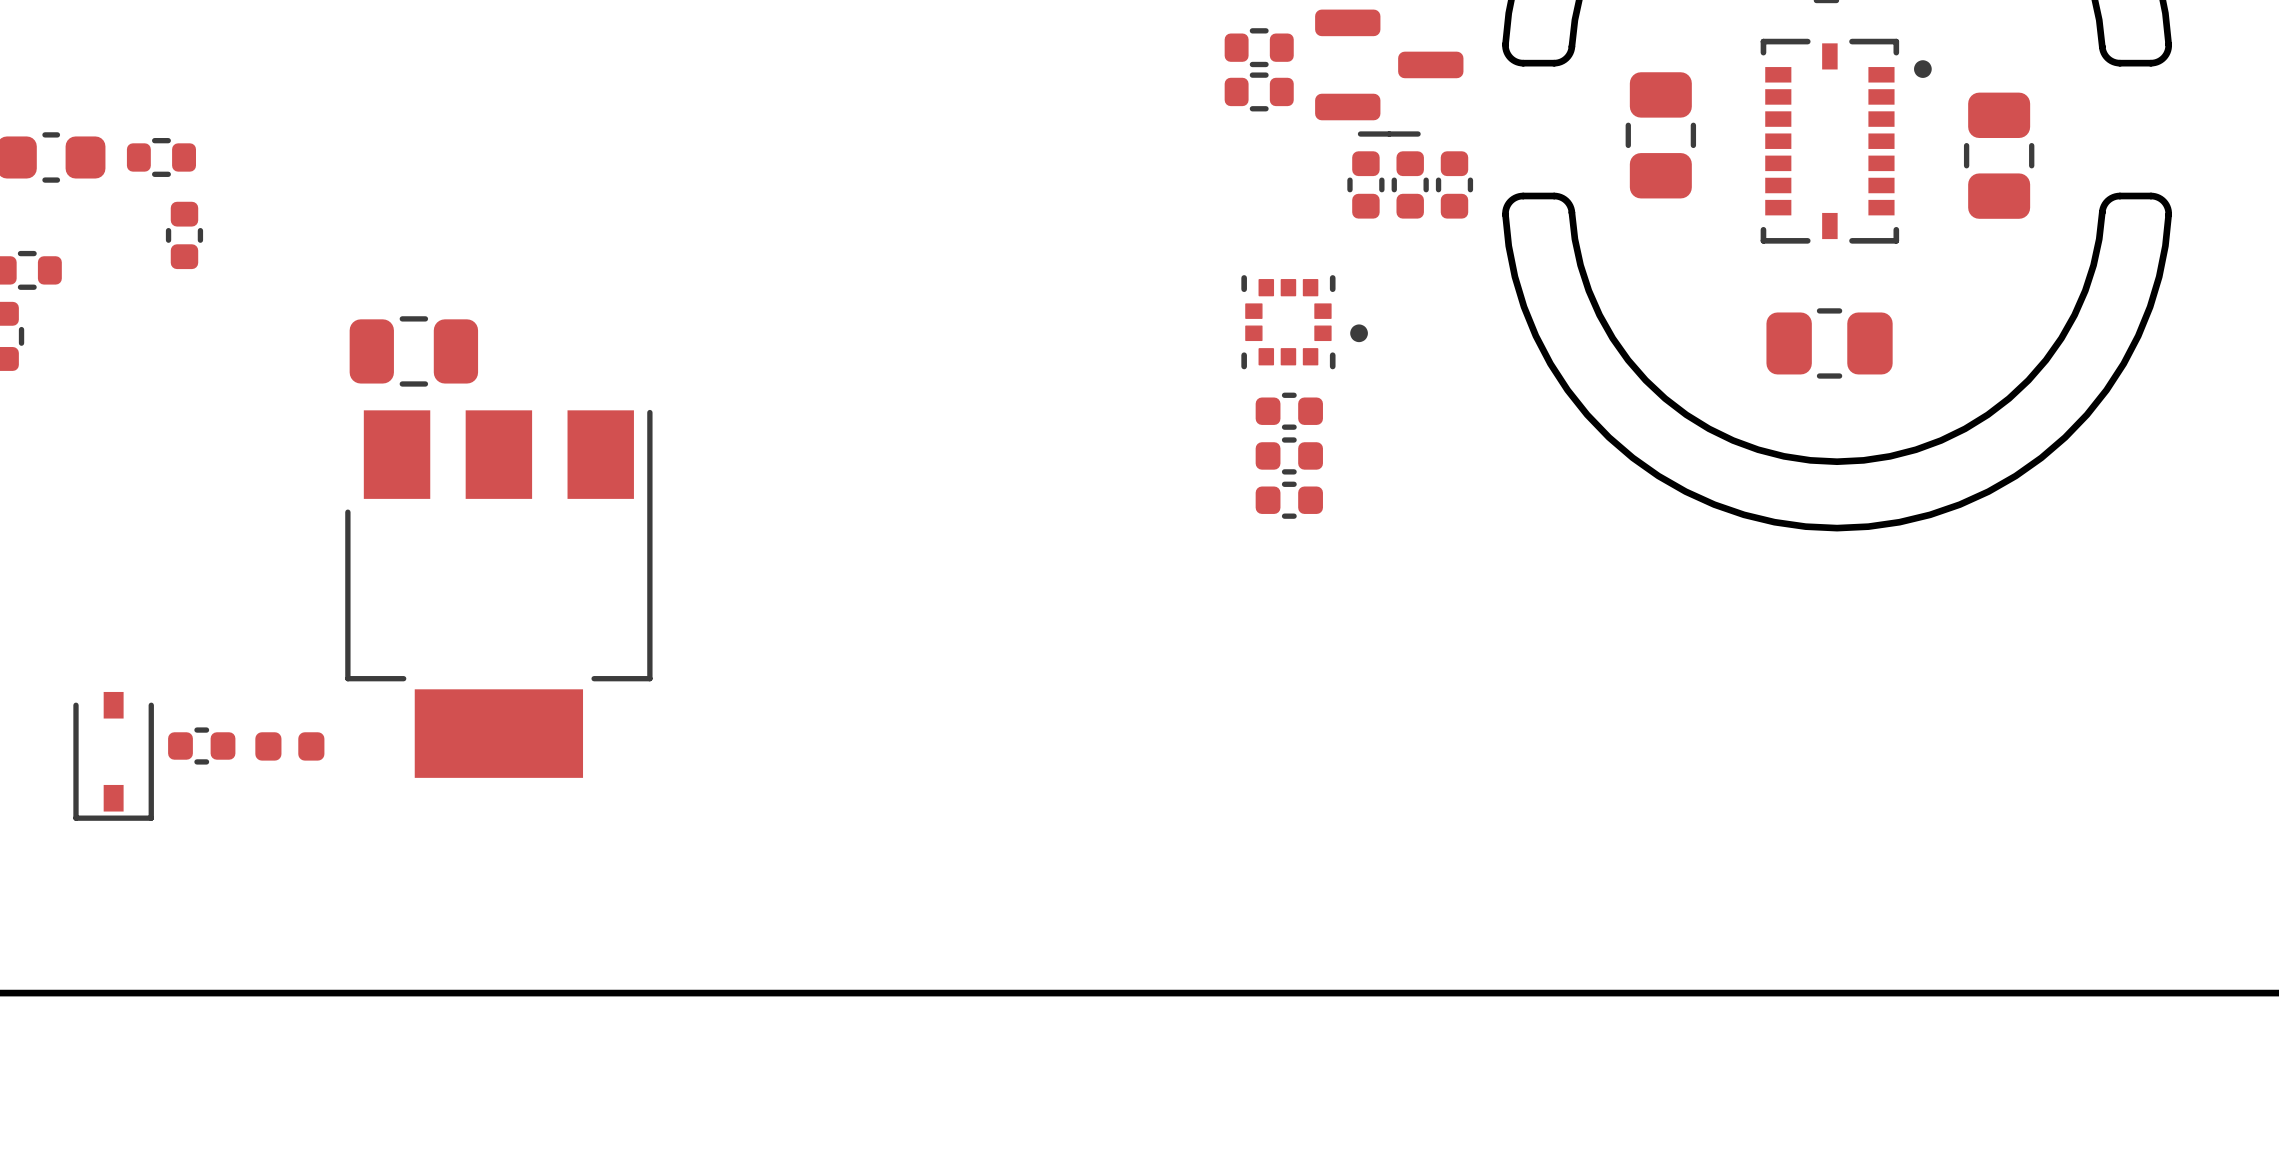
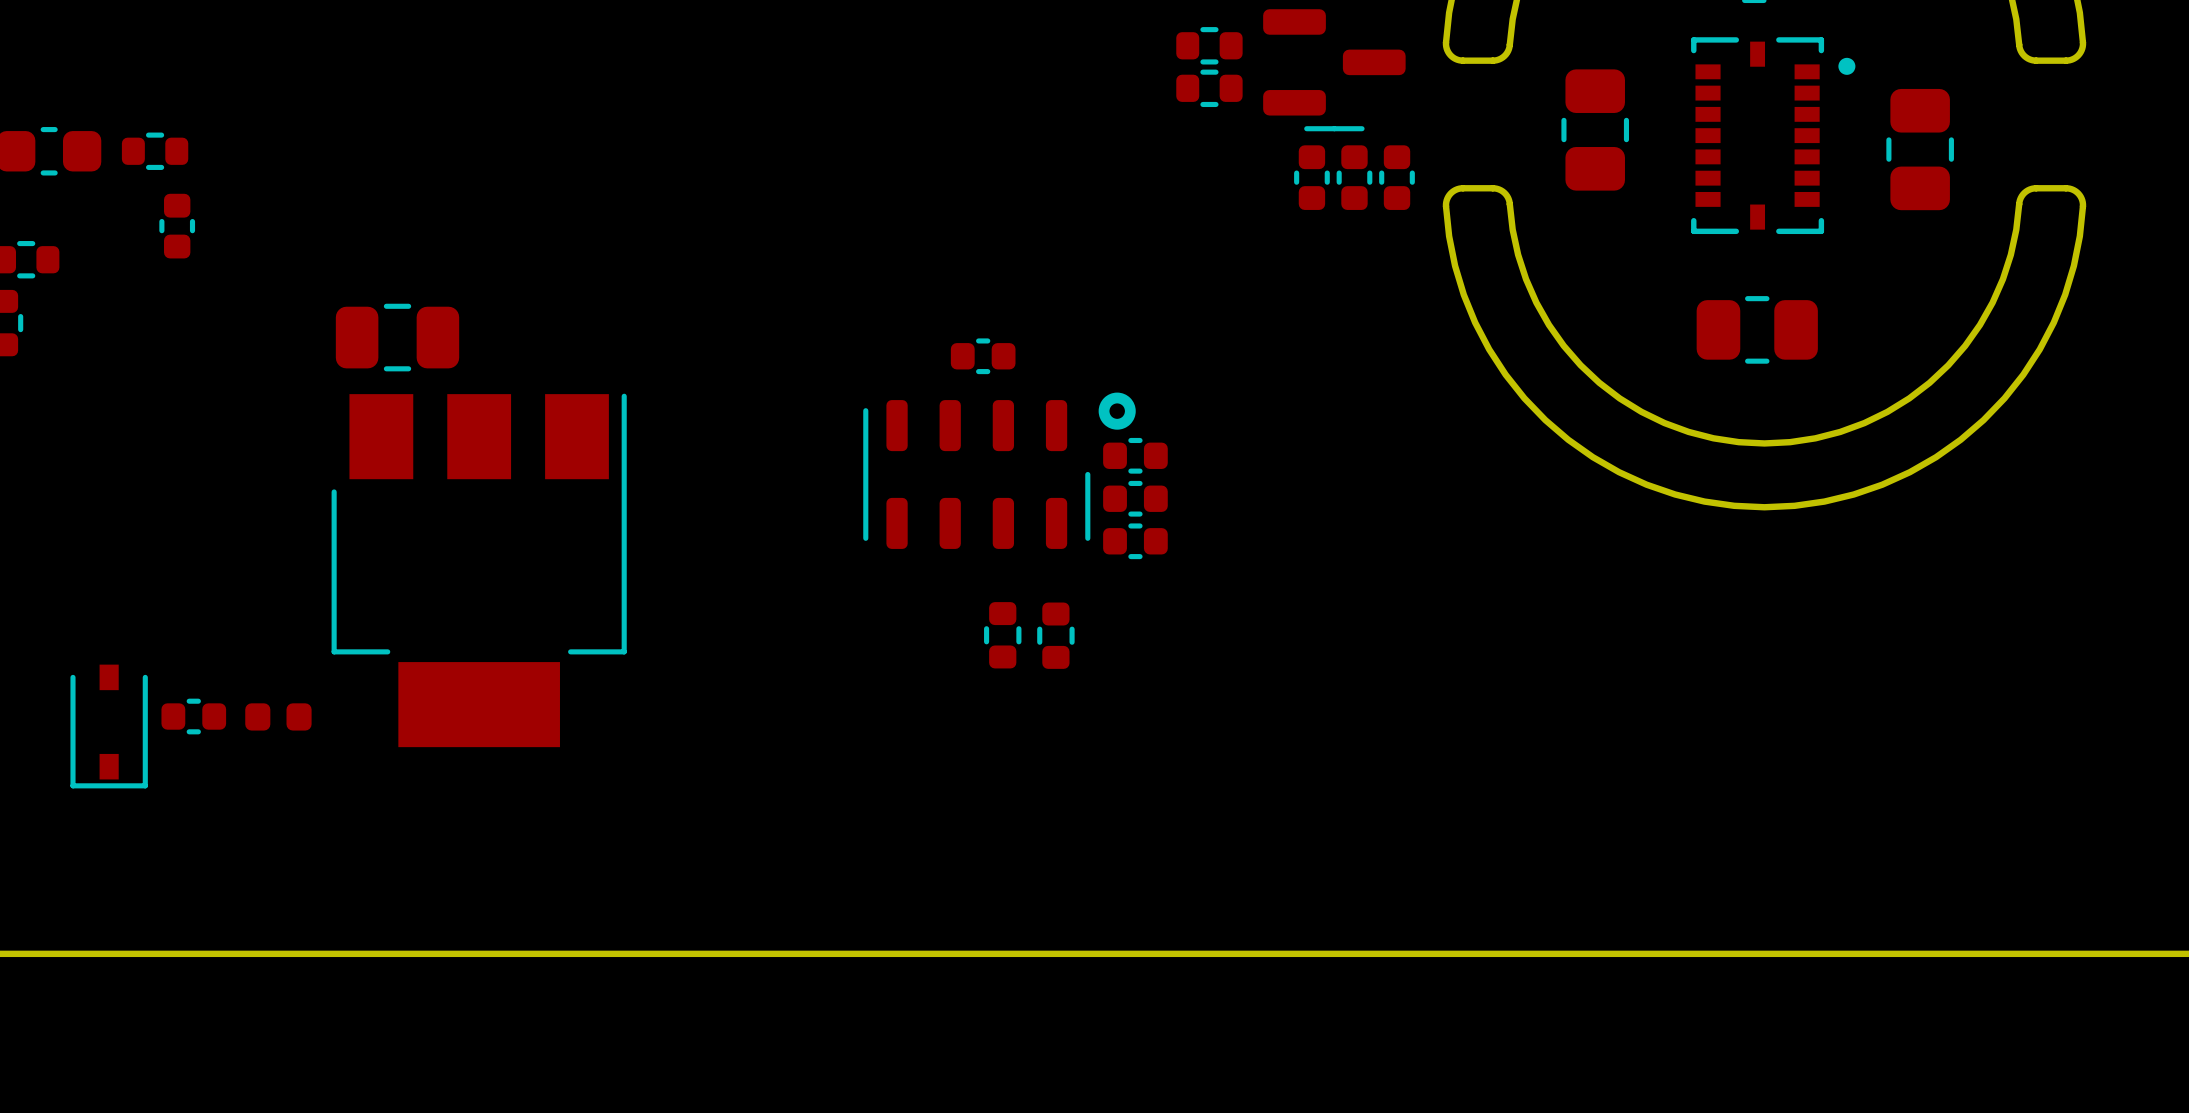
part: (1304, 322) -> none
part: none -> (983, 356)
drawing: none -> [1098, 392, 1136, 430]
part: (1289, 411) -> none
part: (1289, 455) -> none
part: none -> (1135, 455)
part: none -> (976, 474)
part: (1289, 500) -> none
part: none -> (1135, 498)
part: none -> (1135, 541)
part: none -> (1002, 635)
part: none -> (1055, 635)

